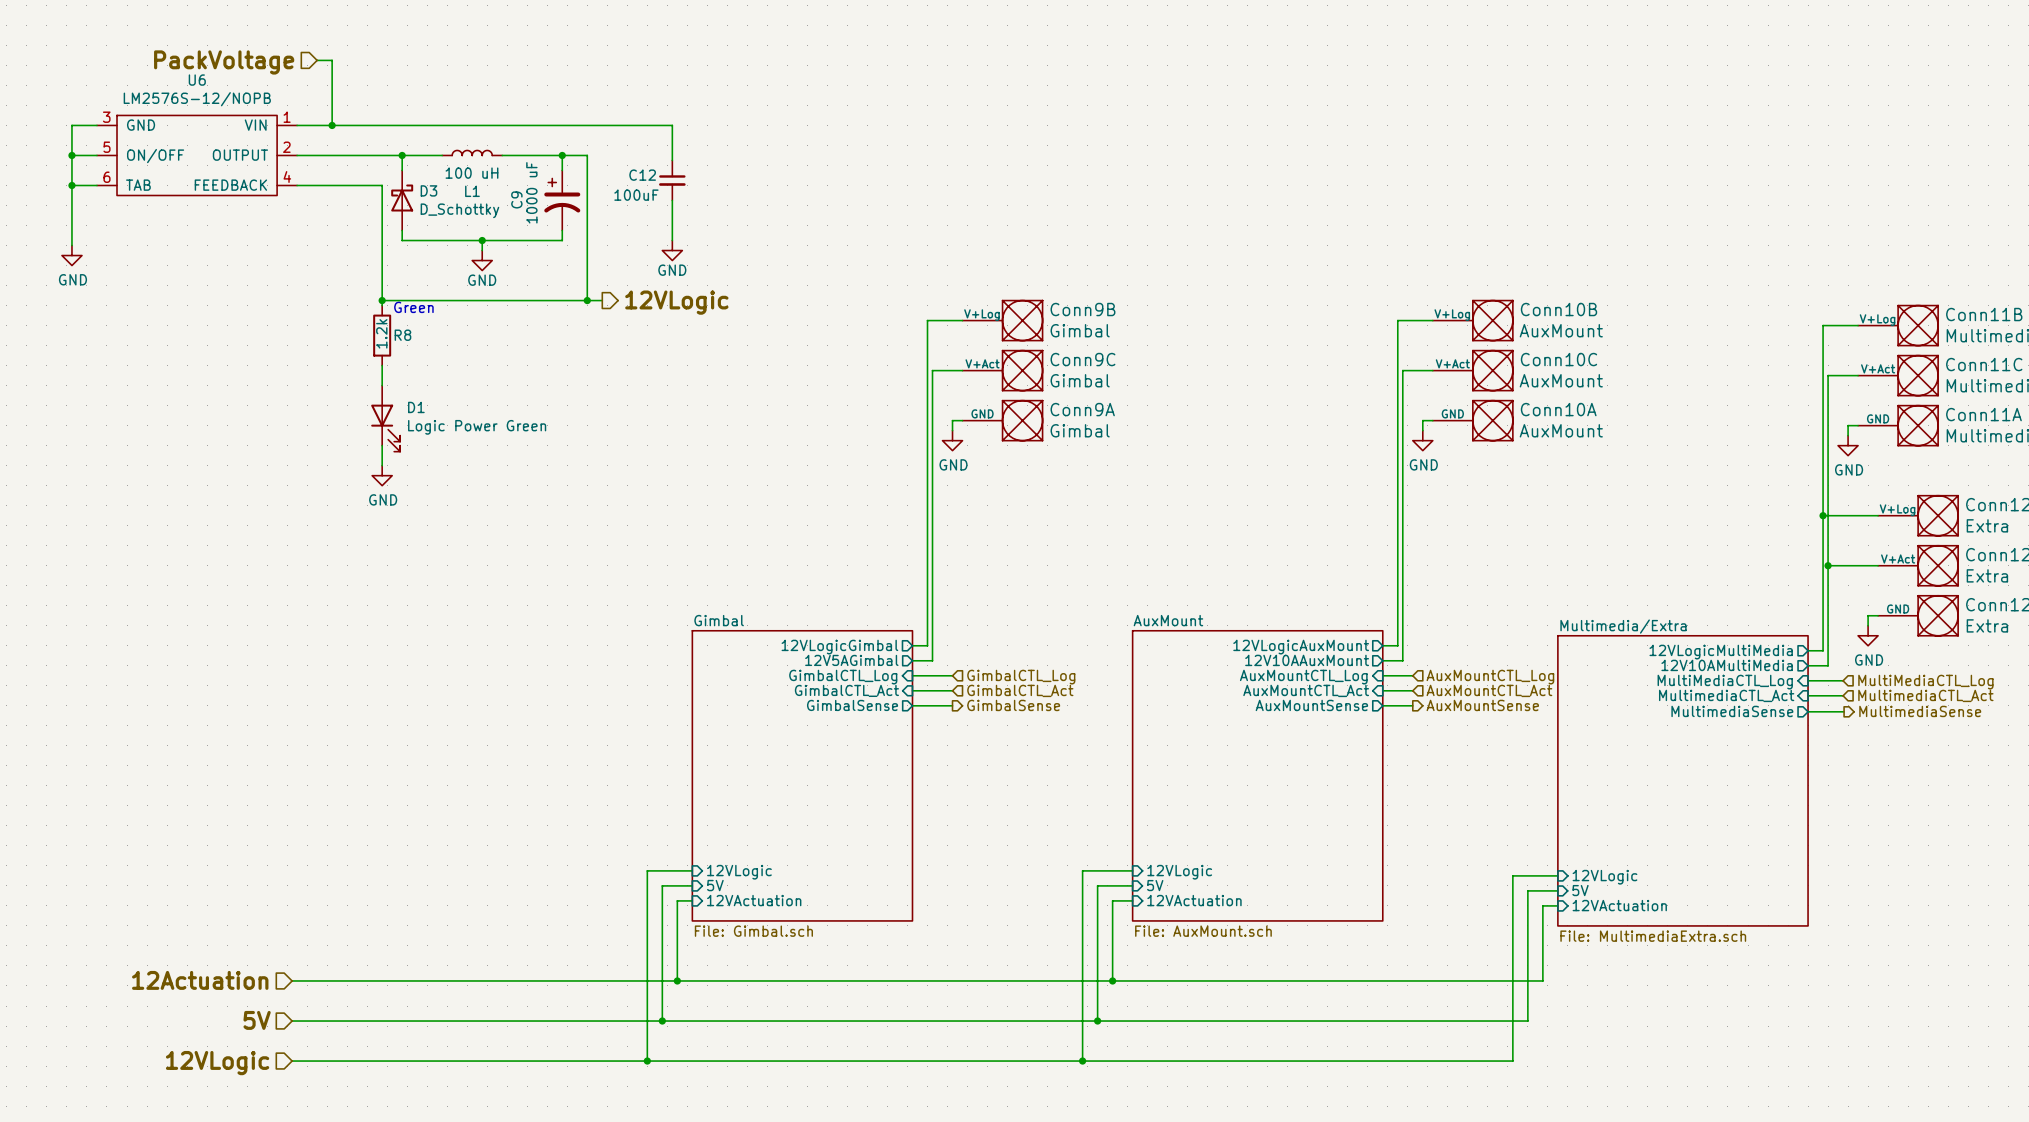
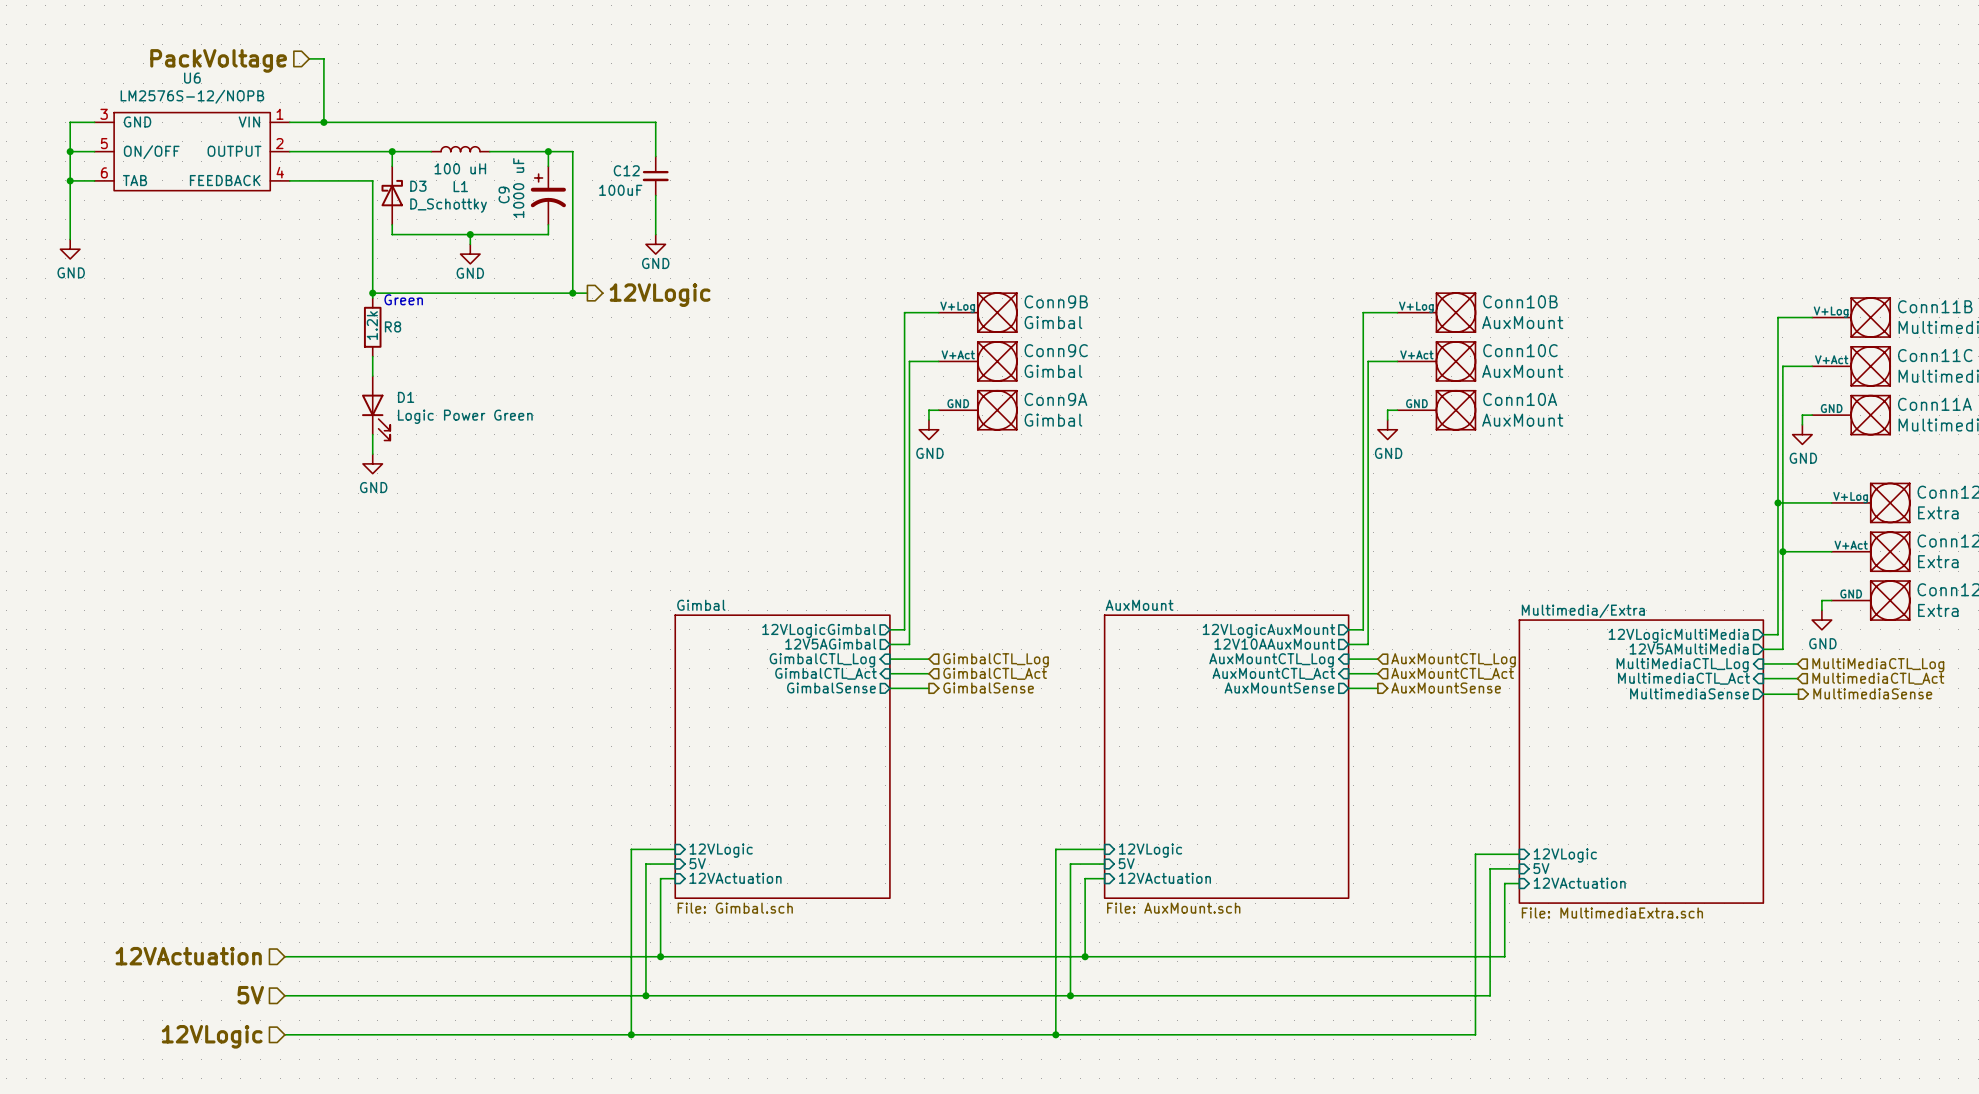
sheet pin: 12V10AMultiMedia (1727, 665) -> 12V5AMultiMedia (1689, 648)
hierarchical label: 12Actuation (200, 980) -> 12VActuation (188, 956)

